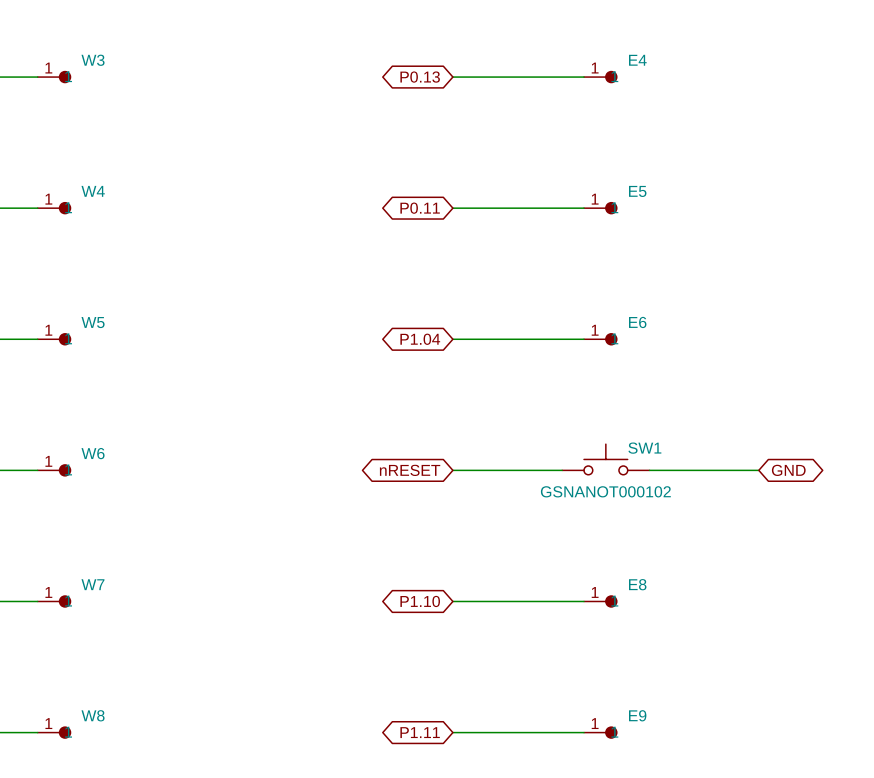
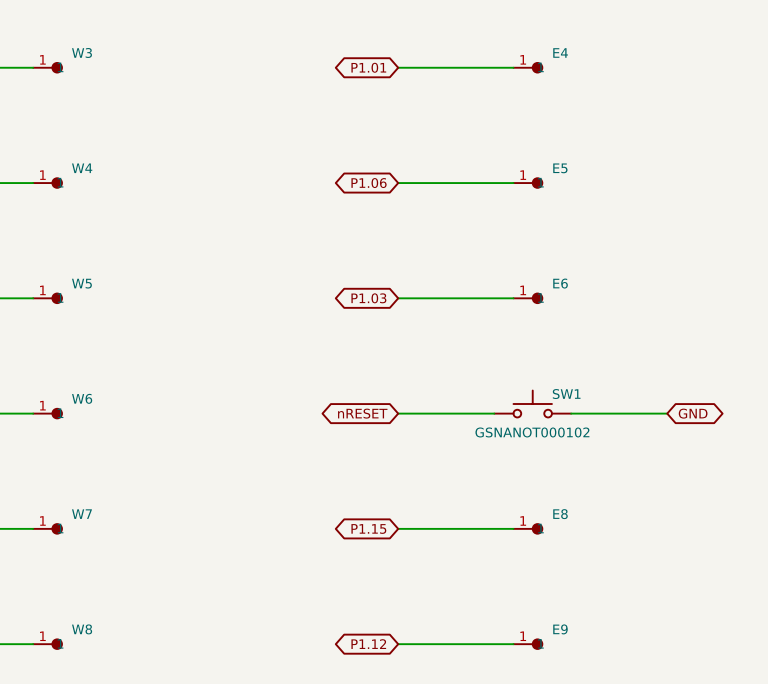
global label: P0.13 (420, 77) -> P1.01 (368, 67)
global label: P0.11 (420, 208) -> P1.06 (369, 183)
global label: P1.04 (420, 339) -> P1.03 (368, 298)
global label: P1.10 (420, 601) -> P1.15 (368, 528)
global label: P1.11 (420, 732) -> P1.12 (368, 644)

